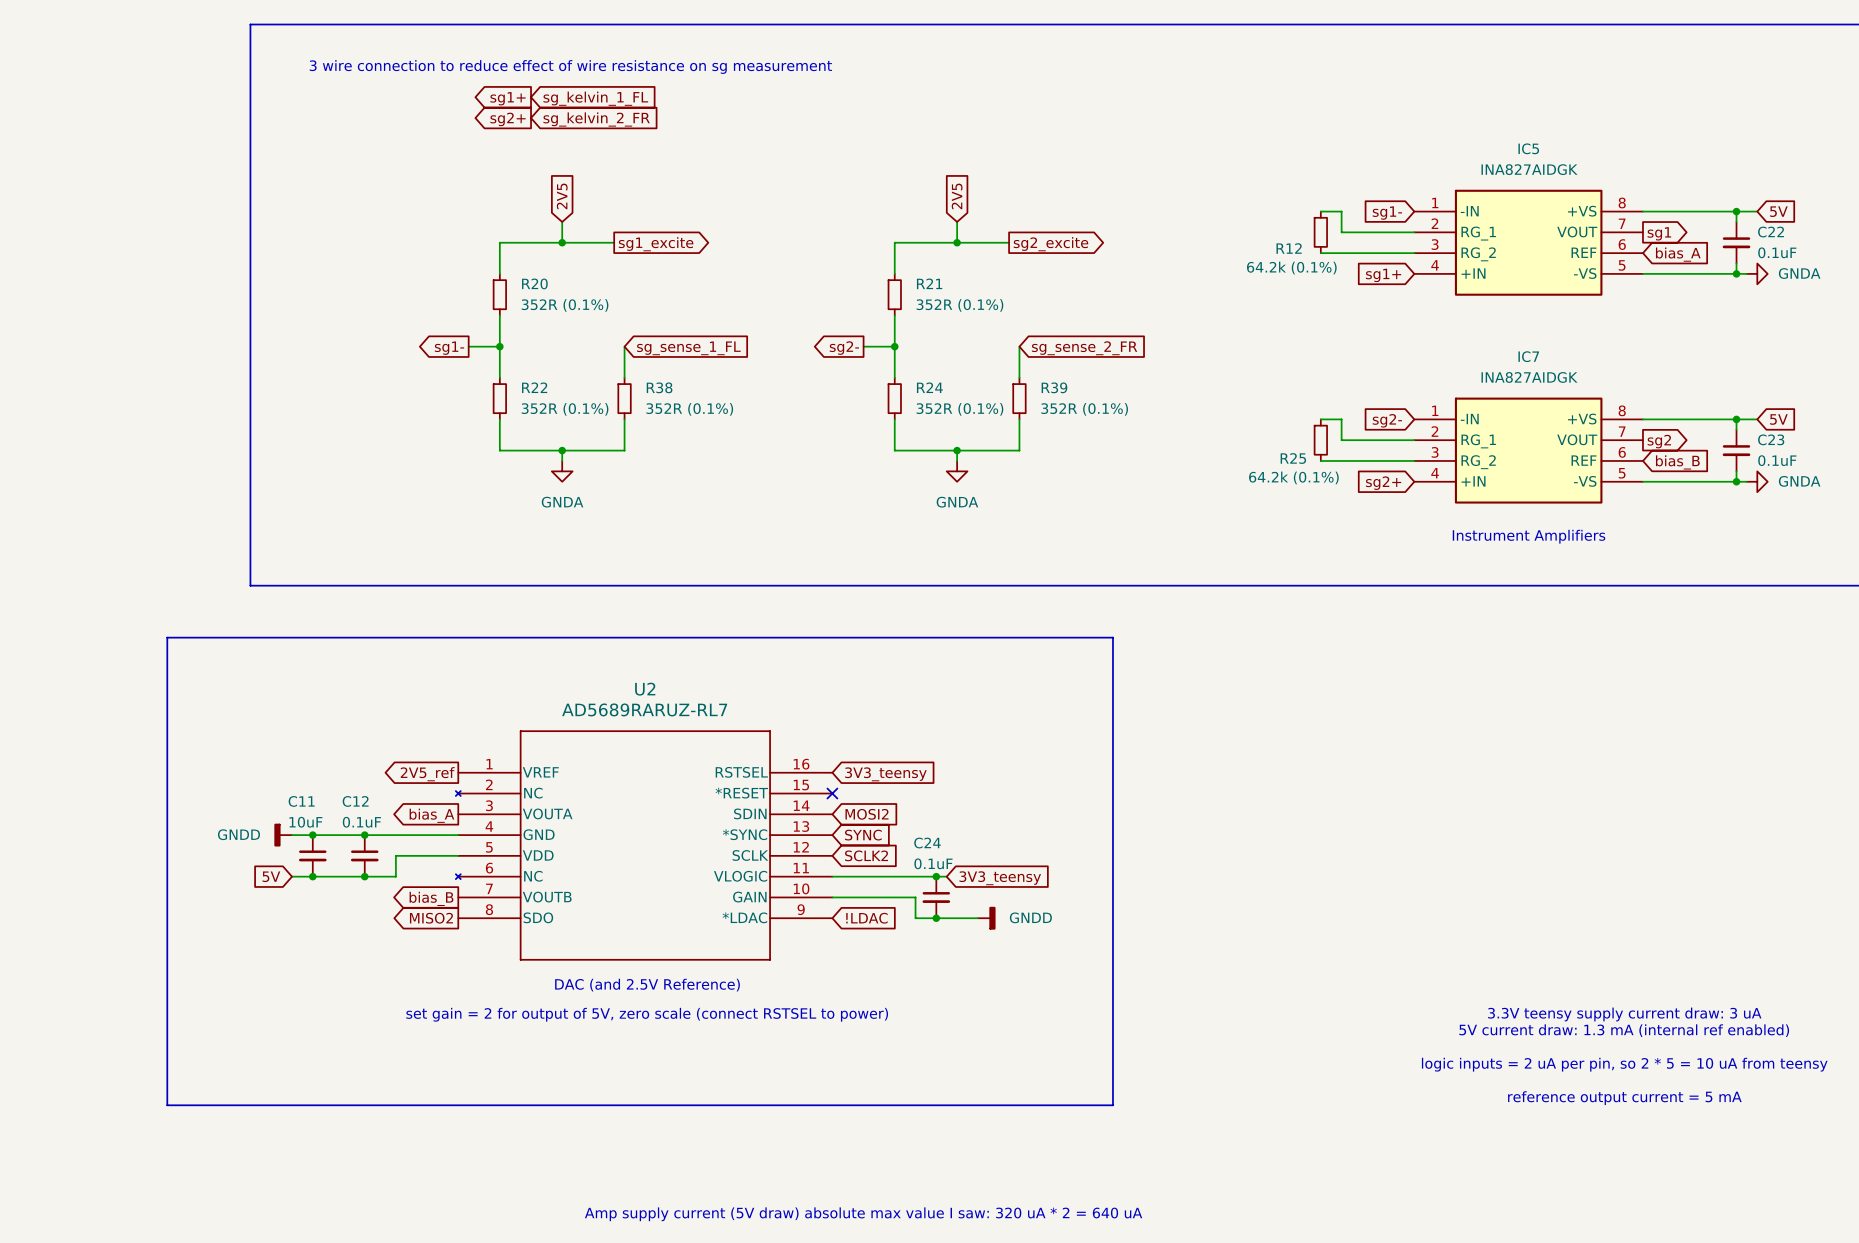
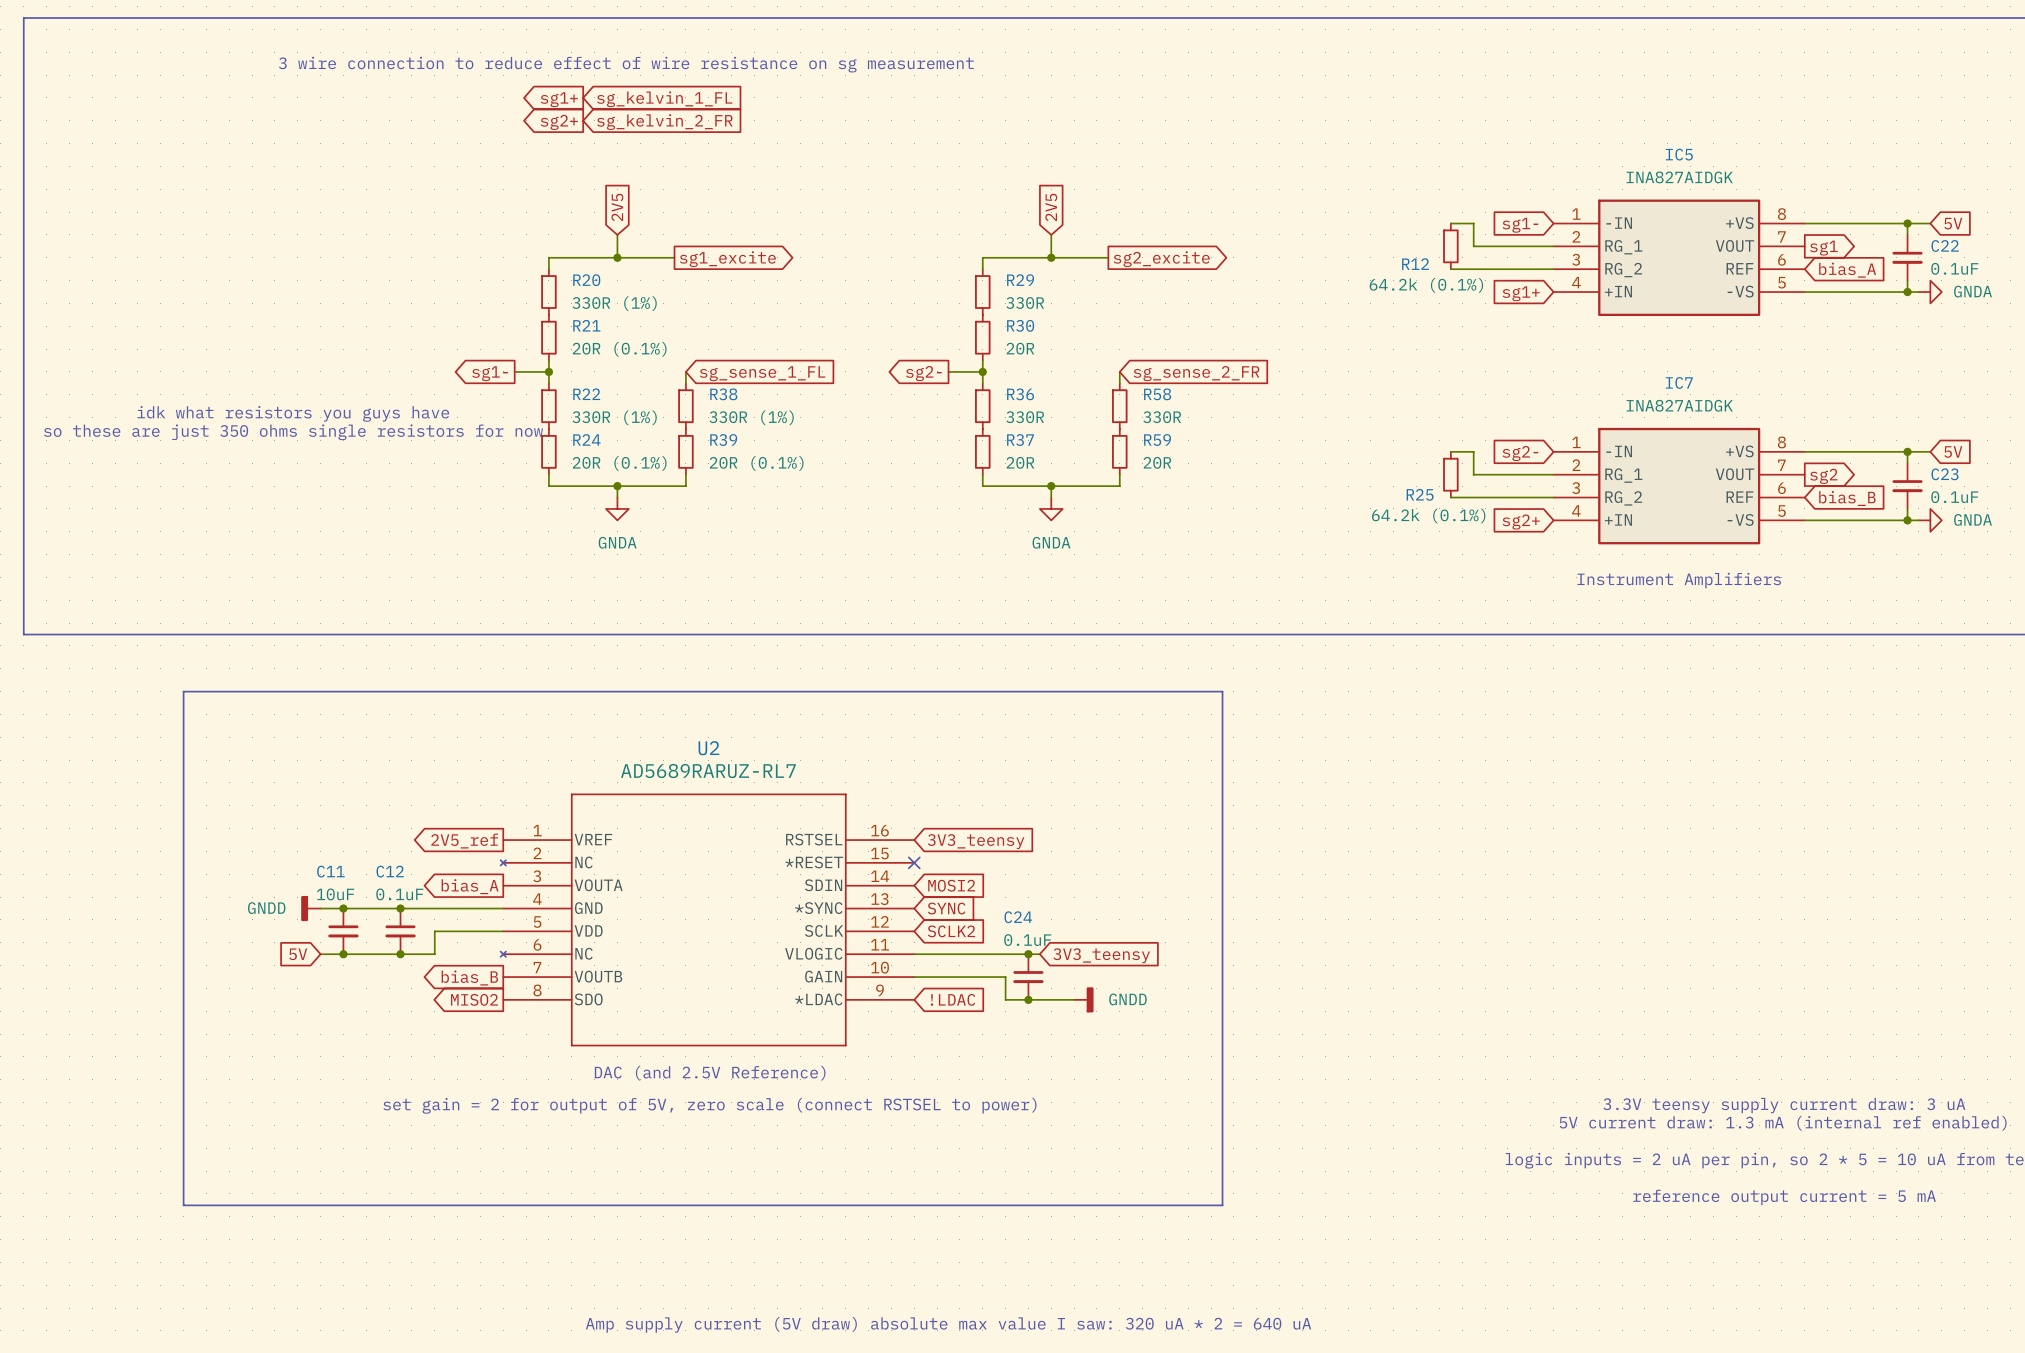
line: (250, 24) (250, 585) -> (274, 18) (23, 18) (23, 634) (274, 634)
wire: (499, 253) (499, 273) -> none
wire: (894, 253) (894, 273) -> none
R29: none -> 330R (982, 292)
R20 position: (499, 294) -> (548, 292)
R21 position: (894, 294) -> (548, 337)
R20 value: 352R (0.1%) (565, 305) -> 330R (1%) (614, 303)
R21 value: 352R (0.1%) (959, 305) -> 20R (0.1%) (619, 349)
wire: (499, 315) (499, 336) -> none
wire: (894, 315) (894, 336) -> none
R30: none -> 20R (982, 337)
wire: (499, 357) (499, 377) -> none
wire: (624, 357) (624, 377) -> none
wire: (894, 357) (894, 377) -> none
wire: (1019, 357) (1019, 377) -> none
R36: none -> 330R (982, 406)
R58: none -> 330R (1119, 406)
text: none -> idk what resistors you guys have (293, 413)
R22 position: (499, 398) -> (548, 406)
R38 position: (624, 398) -> (685, 406)
R24 position: (894, 398) -> (548, 451)
R39 position: (1019, 398) -> (685, 451)
text: none -> so these are just 350 ohms single resistors for now (293, 432)
R22 value: 352R (0.1%) (565, 409) -> 330R (1%) (614, 417)
R38 value: 352R (0.1%) (689, 409) -> 330R (1%) (751, 417)
R24 value: 352R (0.1%) (959, 409) -> 20R (0.1%) (619, 463)
R39 value: 352R (0.1%) (1084, 409) -> 20R (0.1%) (756, 463)
wire: (499, 419) (499, 440) -> none
wire: (624, 419) (624, 440) -> none
wire: (894, 419) (894, 440) -> none
R37: none -> 20R (982, 451)
wire: (1019, 419) (1019, 440) -> none
R59: none -> 20R (1119, 451)

